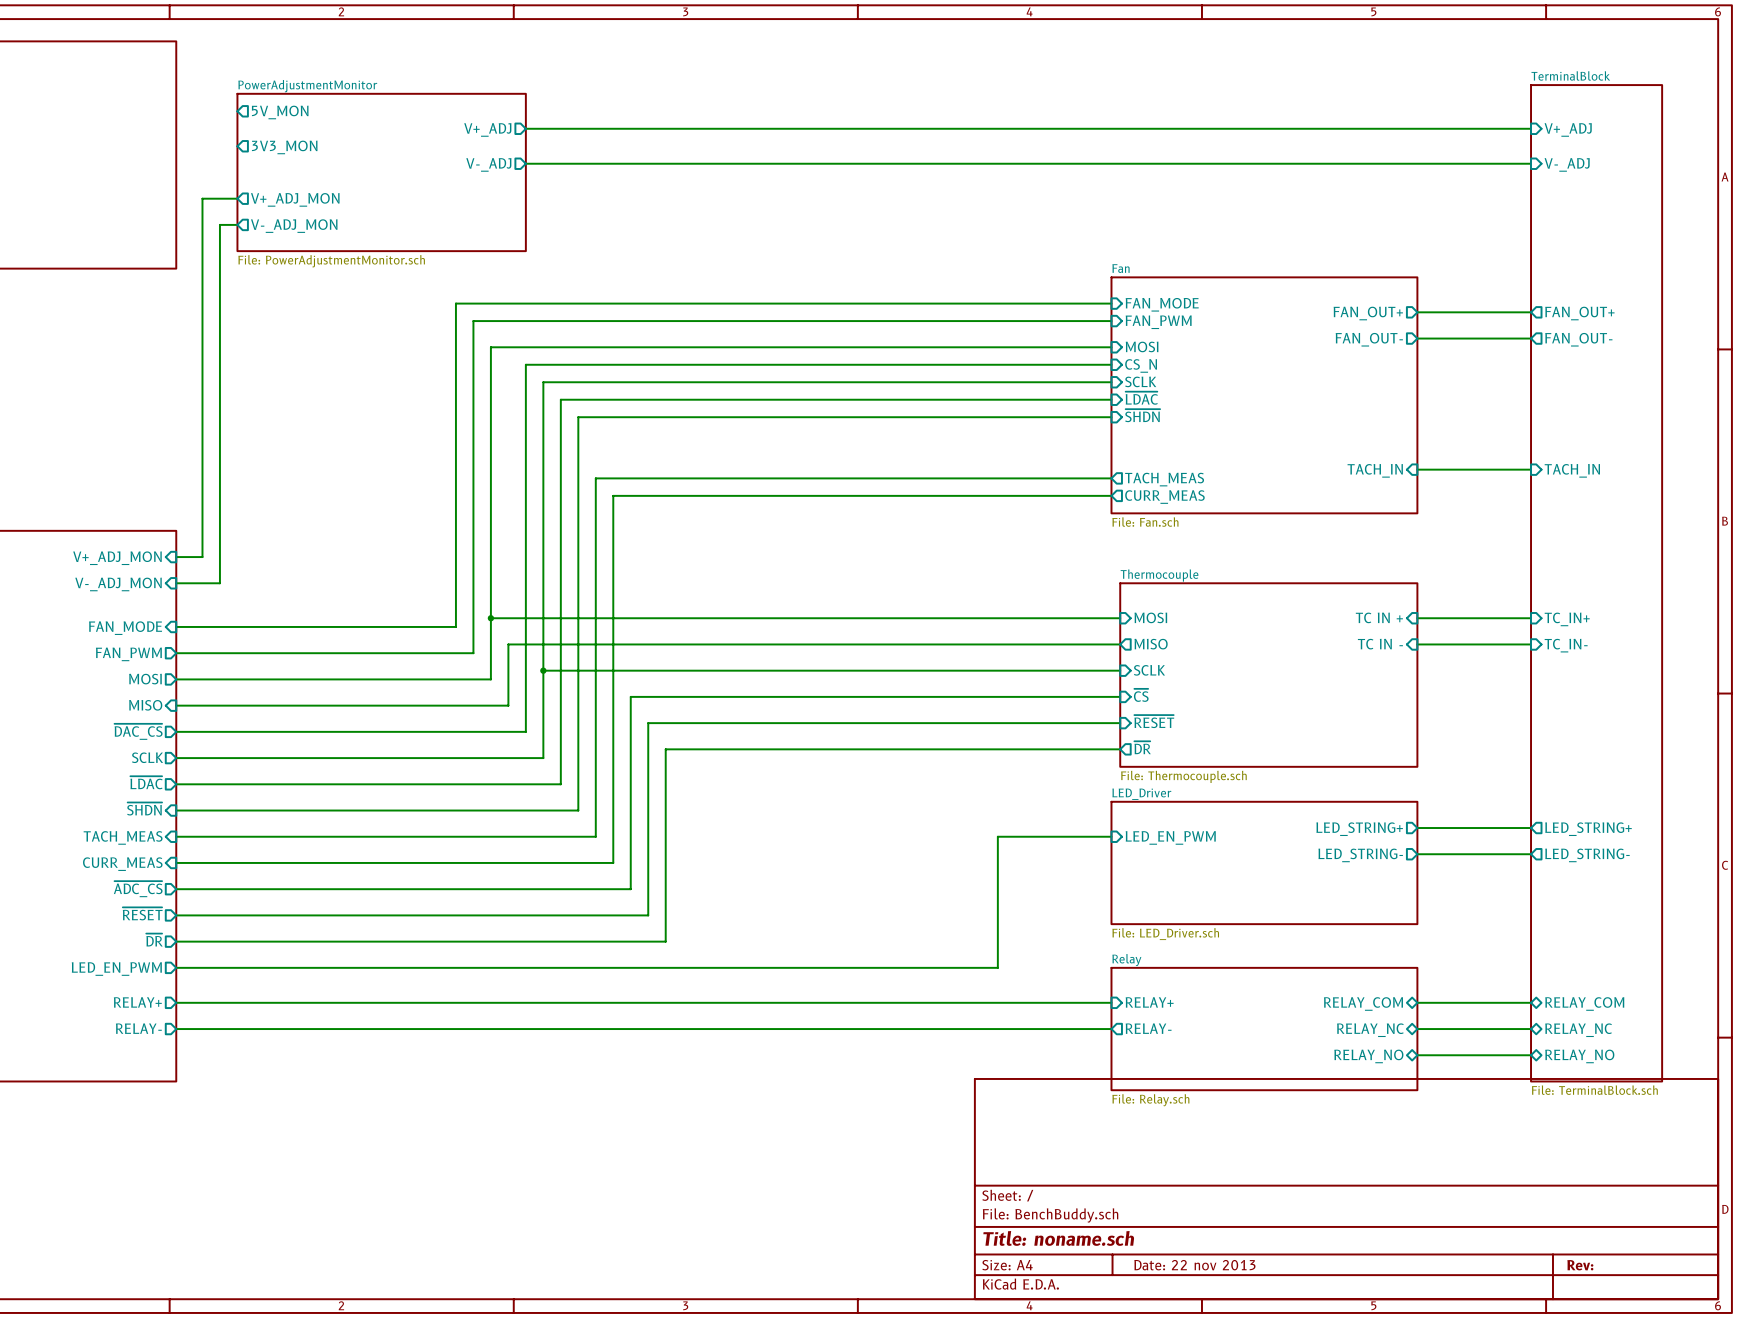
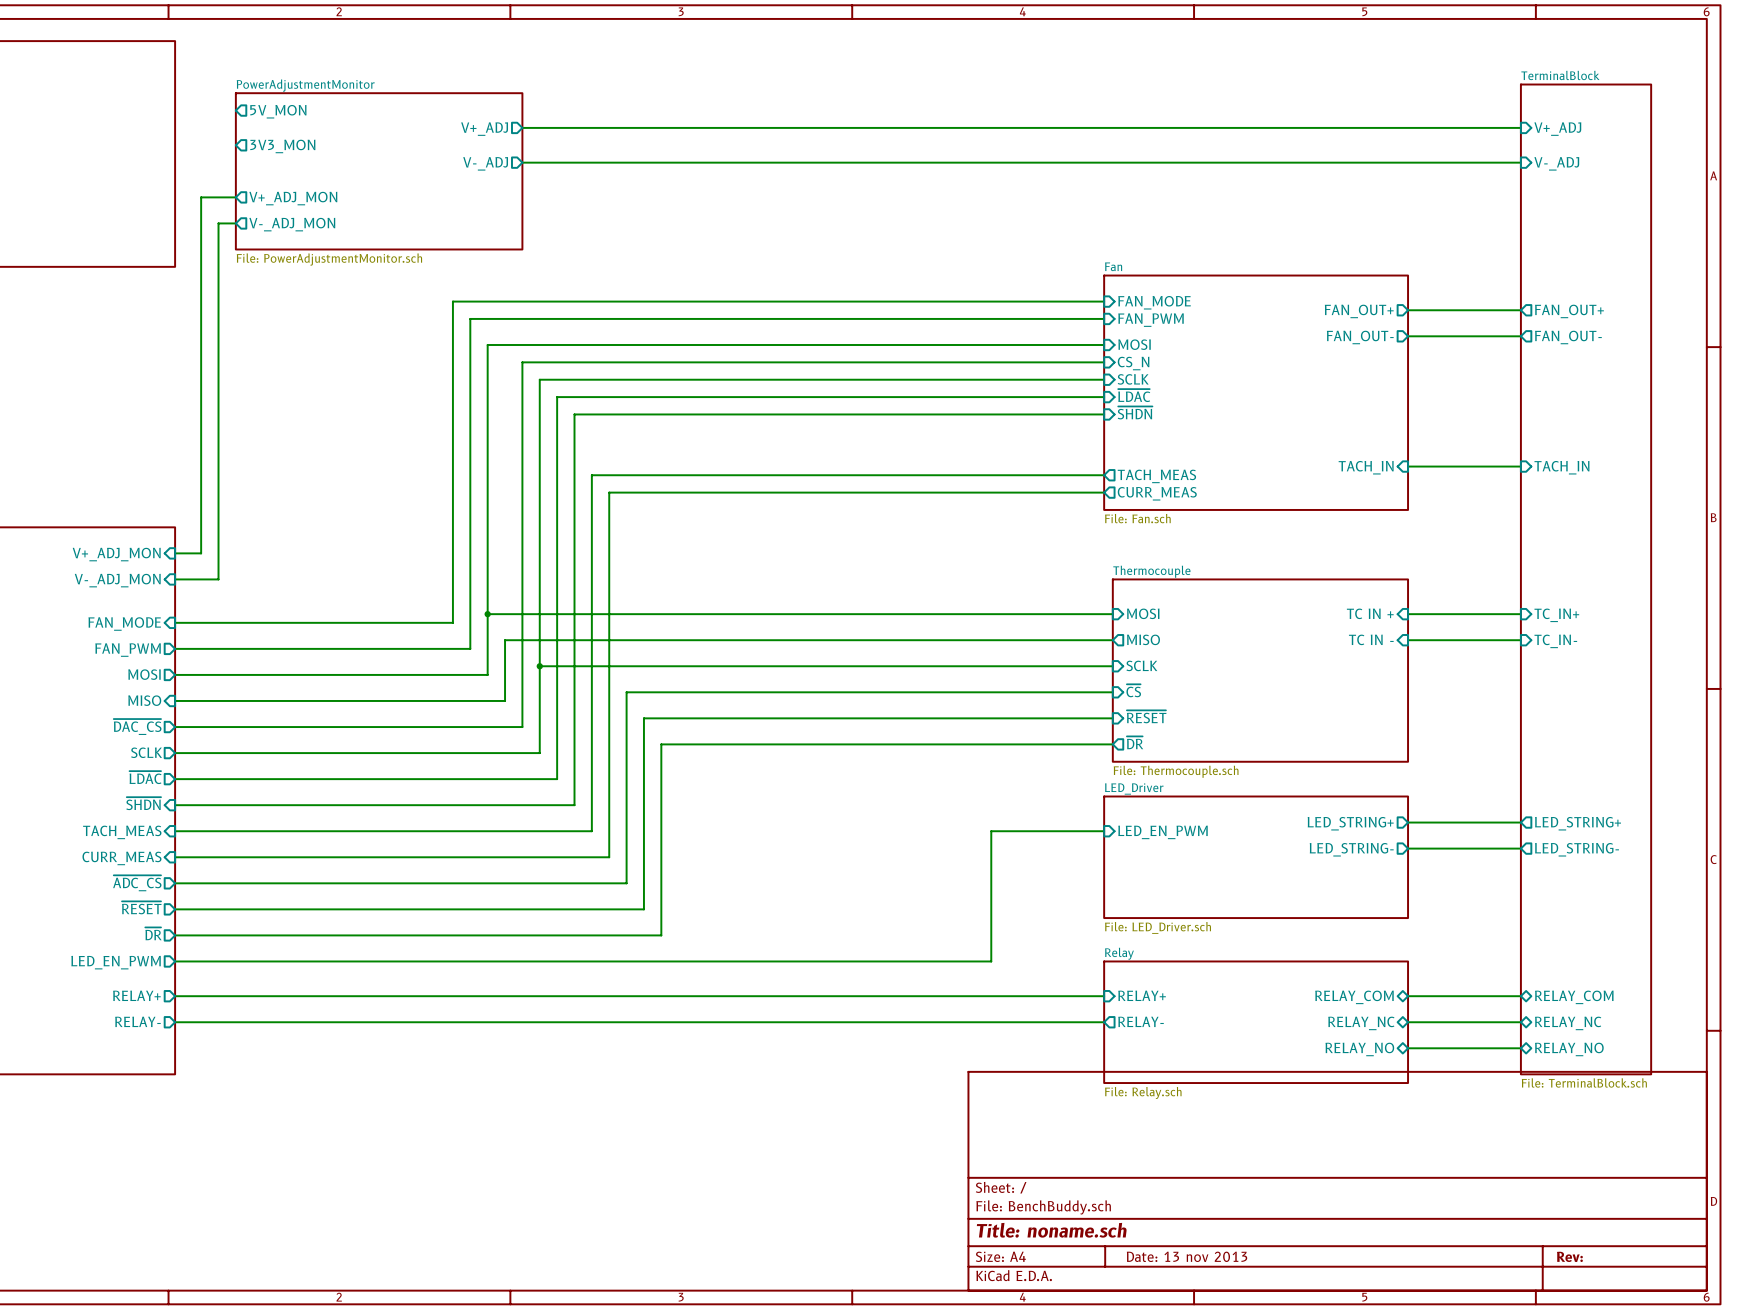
title block: Date: 22 nov 2013 (1194, 1265) -> Date: 13 nov 2013 (1187, 1256)

